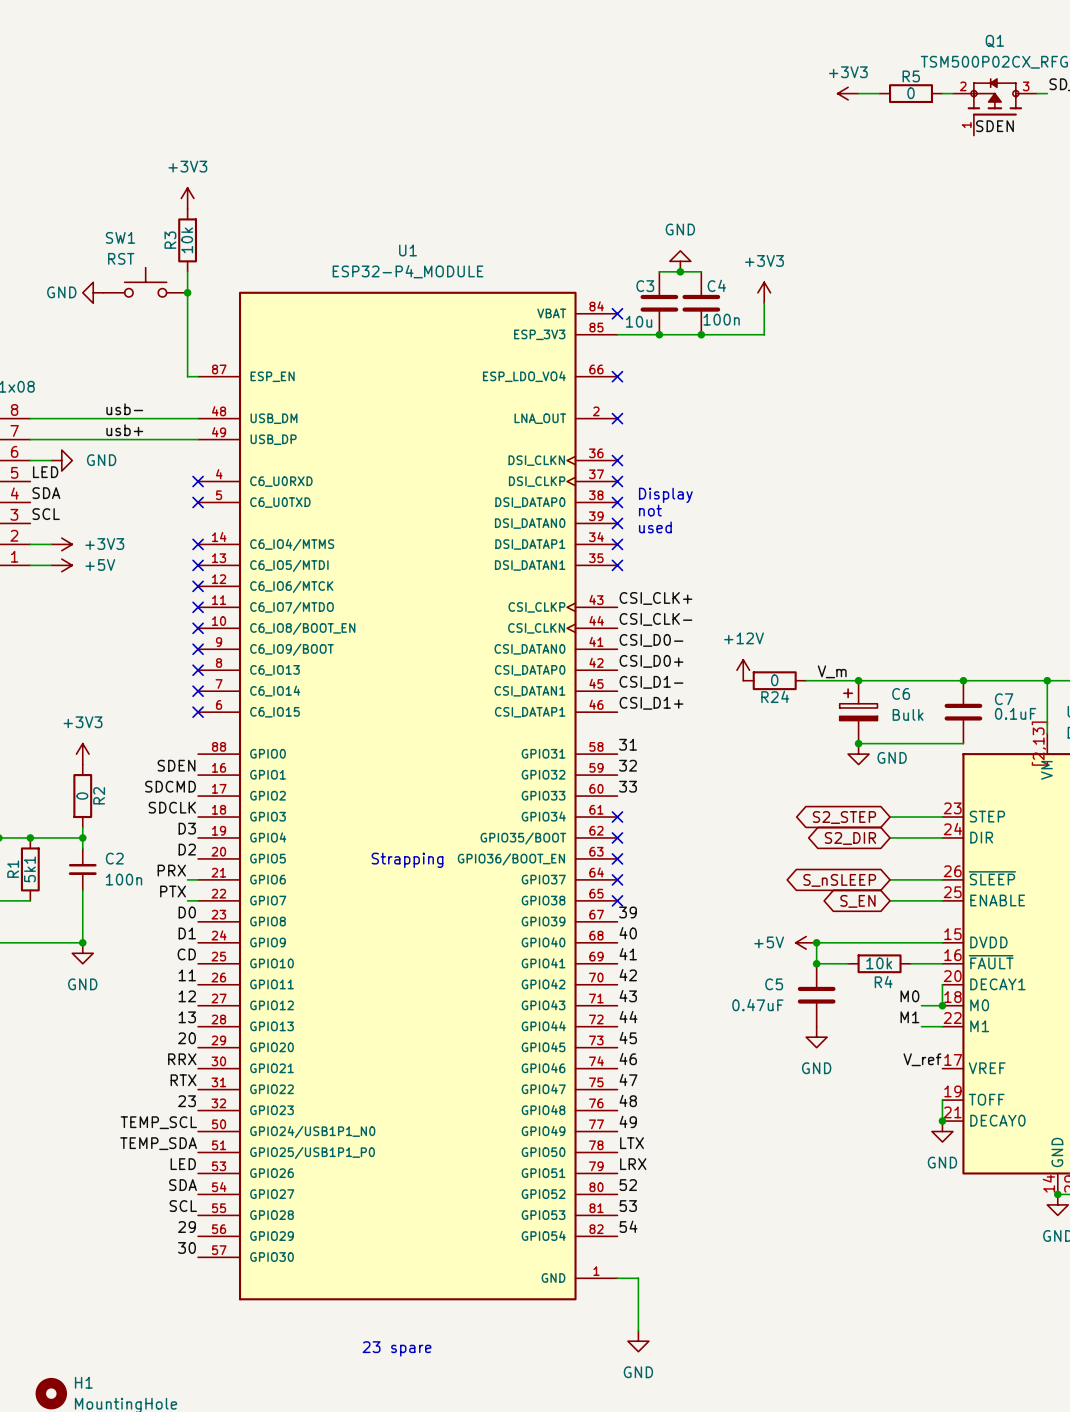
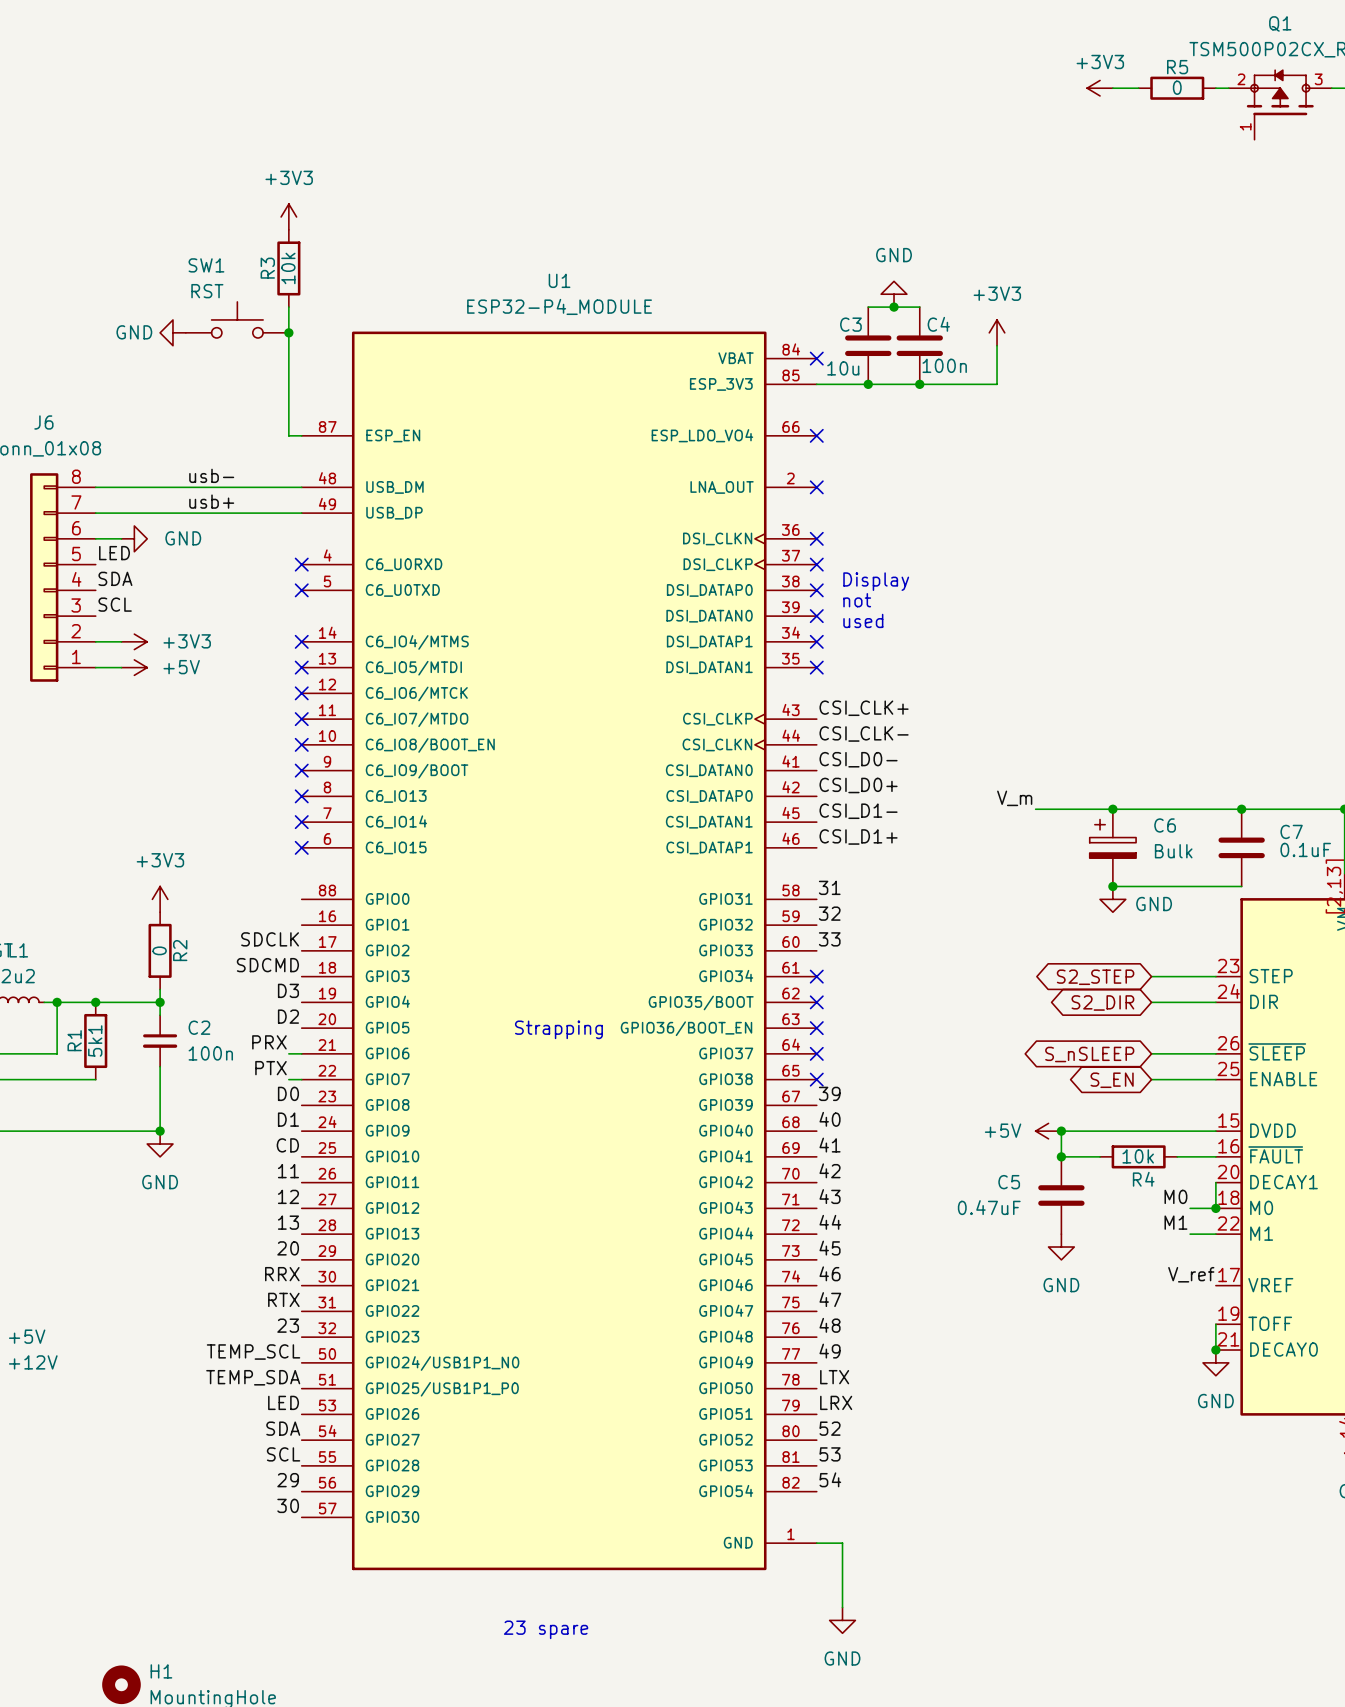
label: SDEN (994, 126) -> none
power symbol: +12V (743, 670) -> none
label position: V_m (832, 671) -> V_m (1014, 798)
R24: 0 (774, 680) -> none
label: SDEN (176, 765) -> none
label: SDCMD (170, 786) -> SDCLK (270, 939)
label: SDCLK (172, 807) -> SDCMD (267, 965)

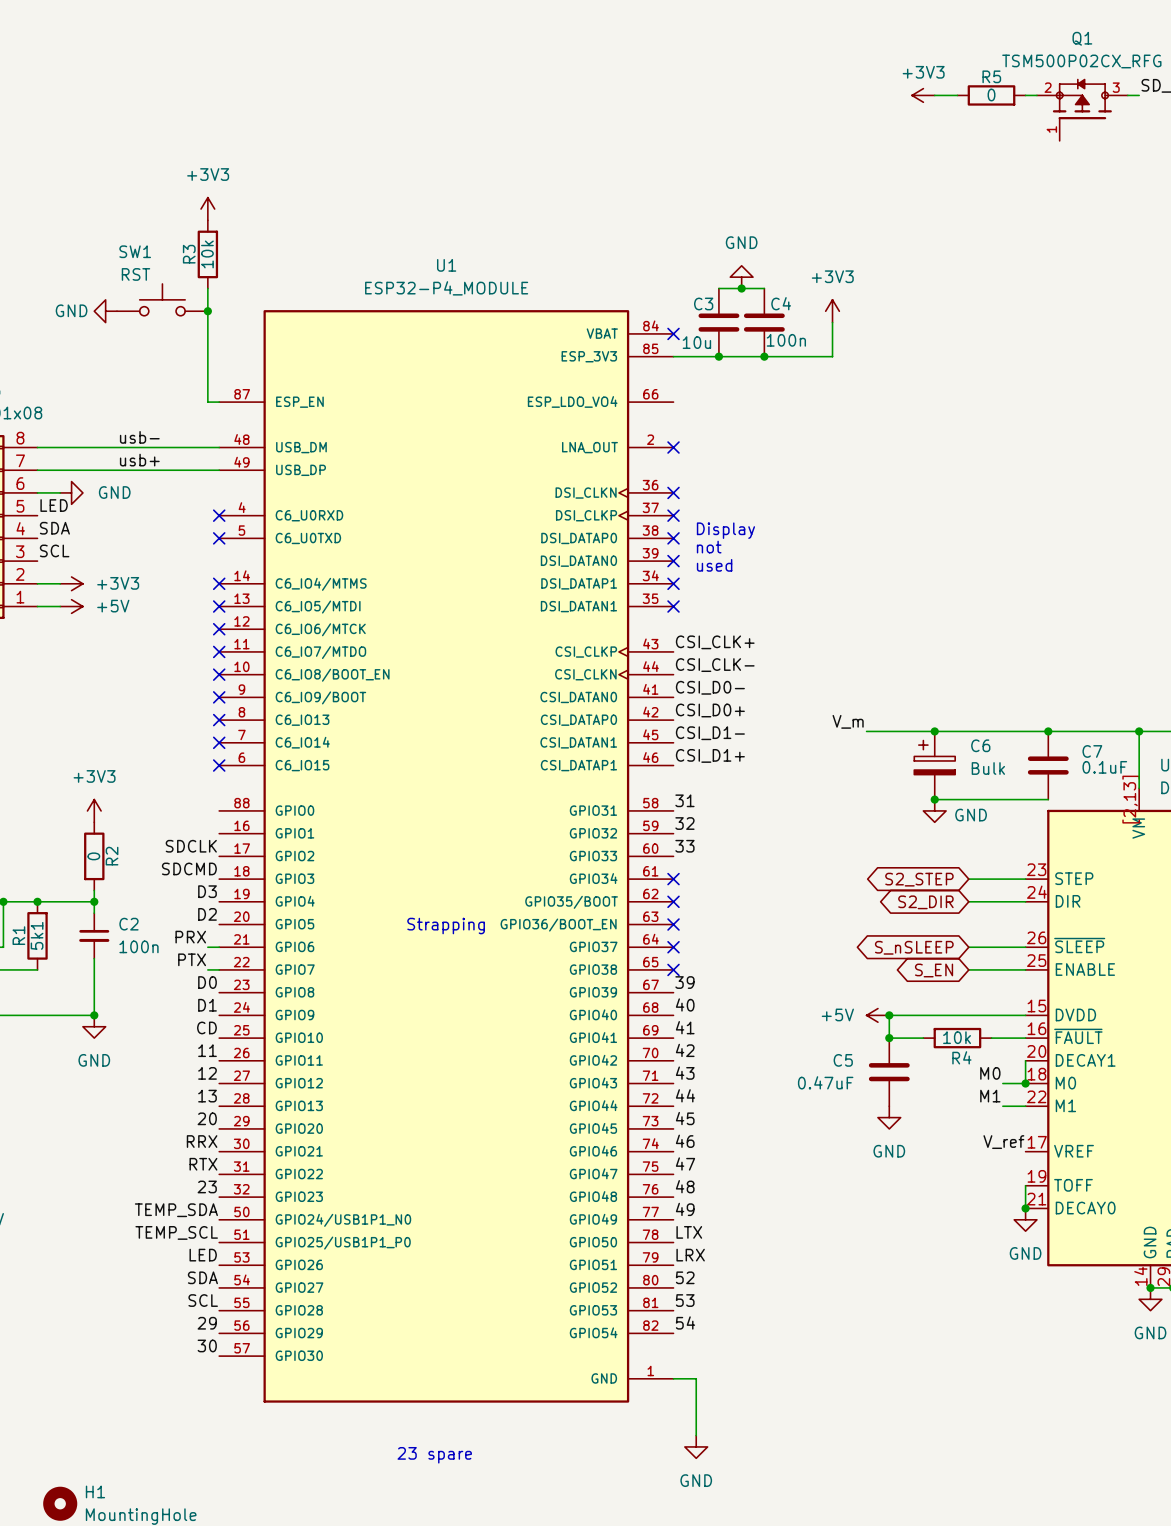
no-connect mark: (816, 435) -> none
label: TEMP_SCL (253, 1352) -> TEMP_SDA (176, 1210)
label: TEMP_SDA (253, 1377) -> TEMP_SCL (176, 1232)

